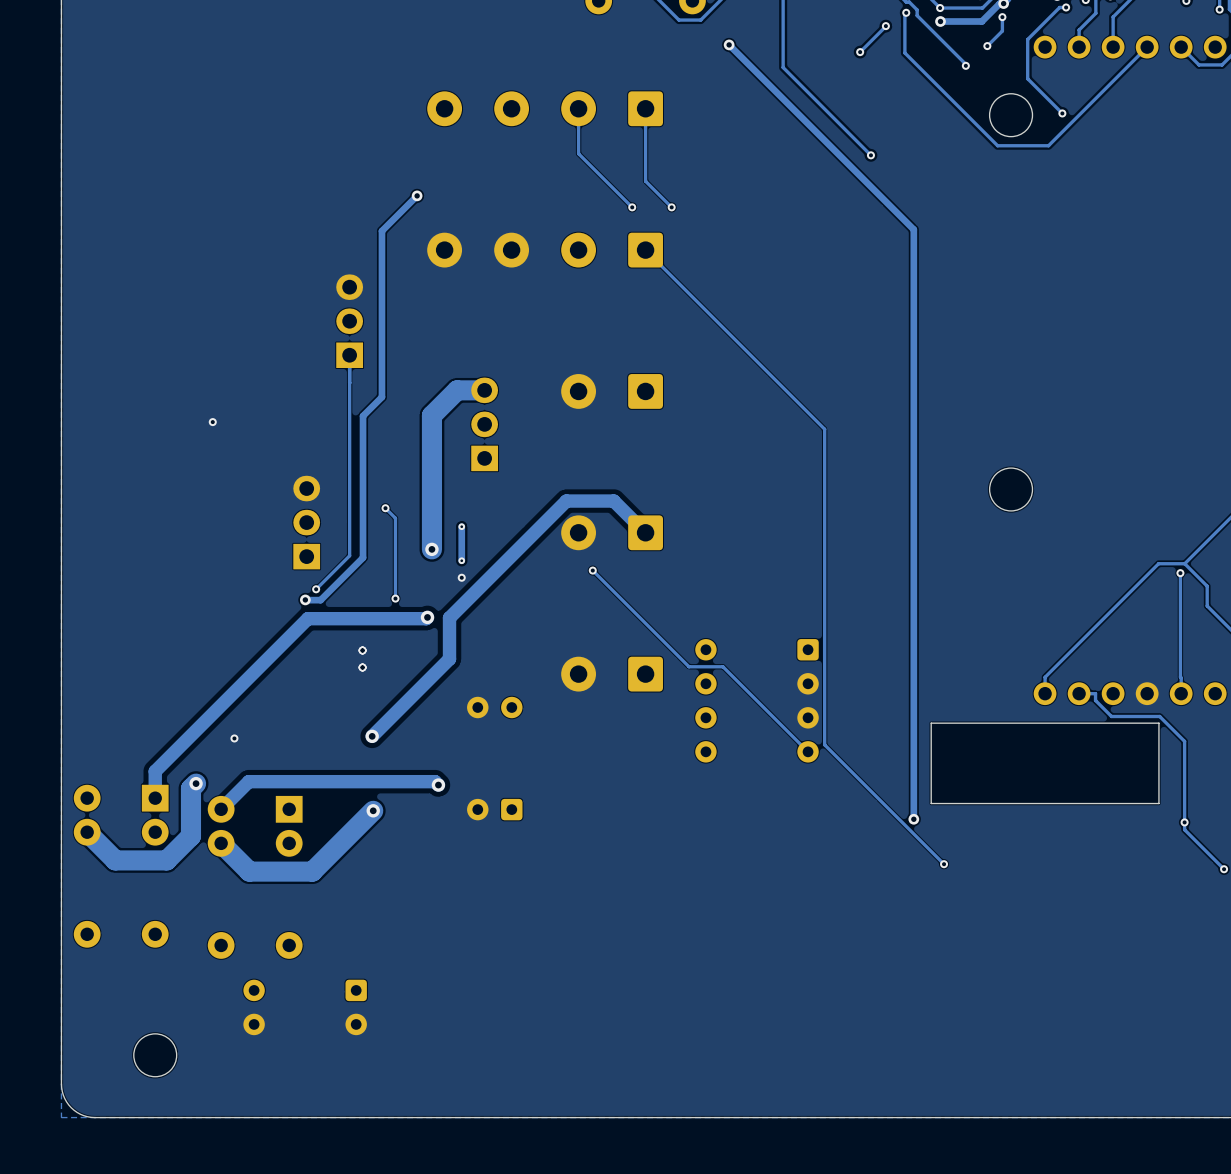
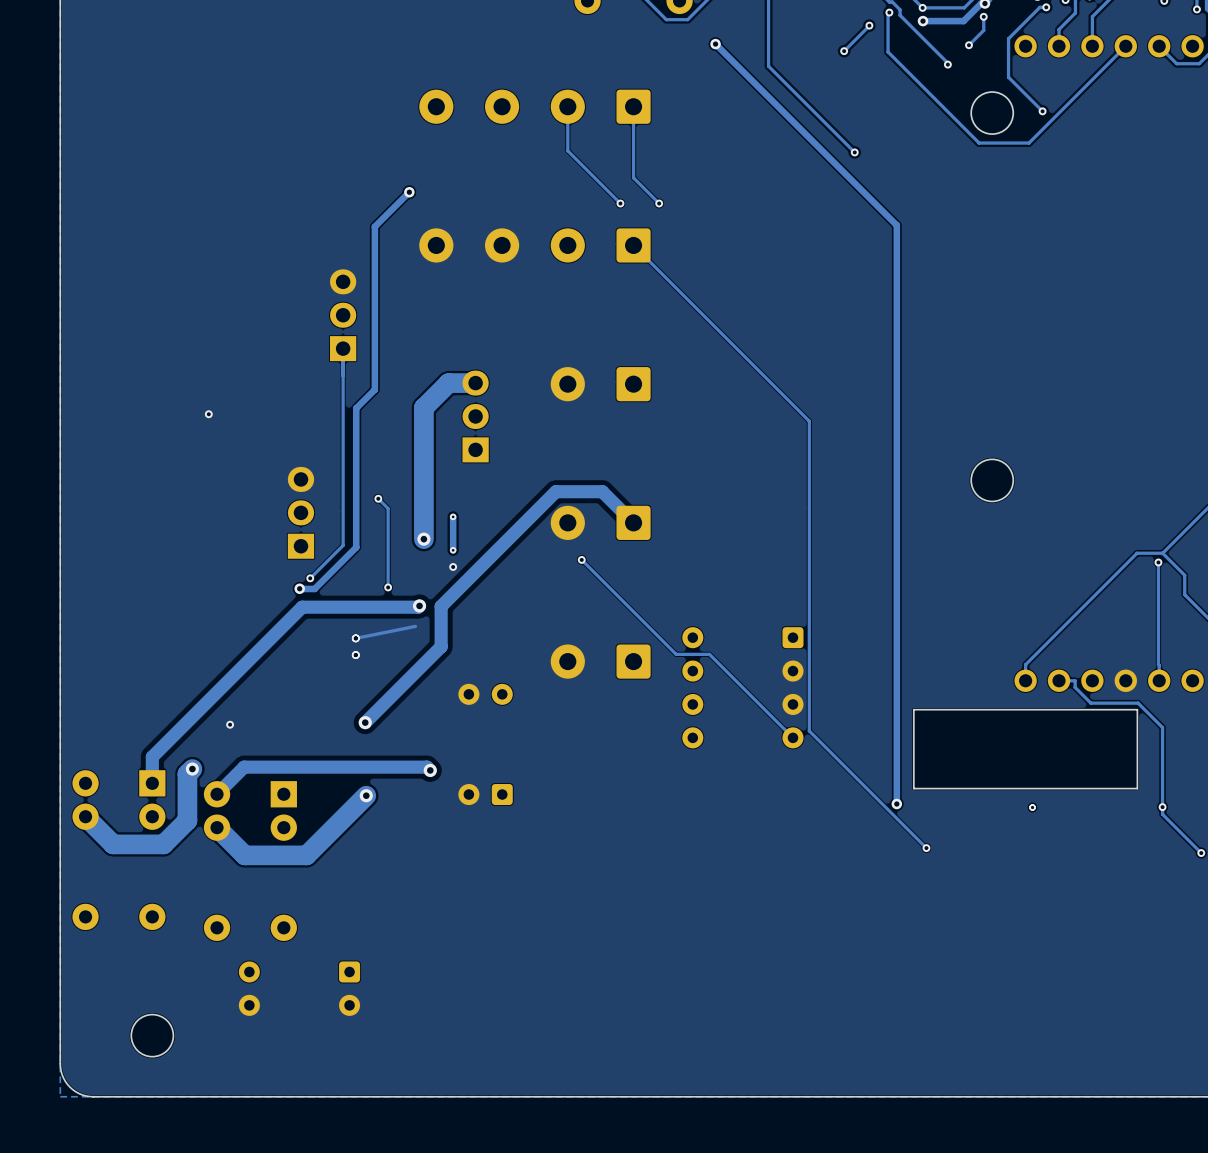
track: none -> (415, 626) (355, 638)
via: none -> (1032, 807)

